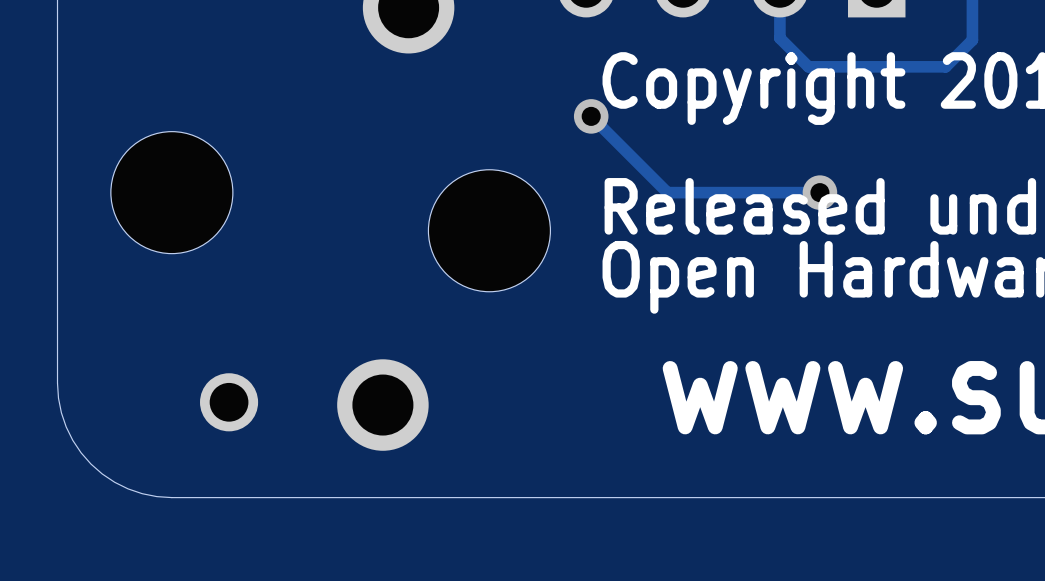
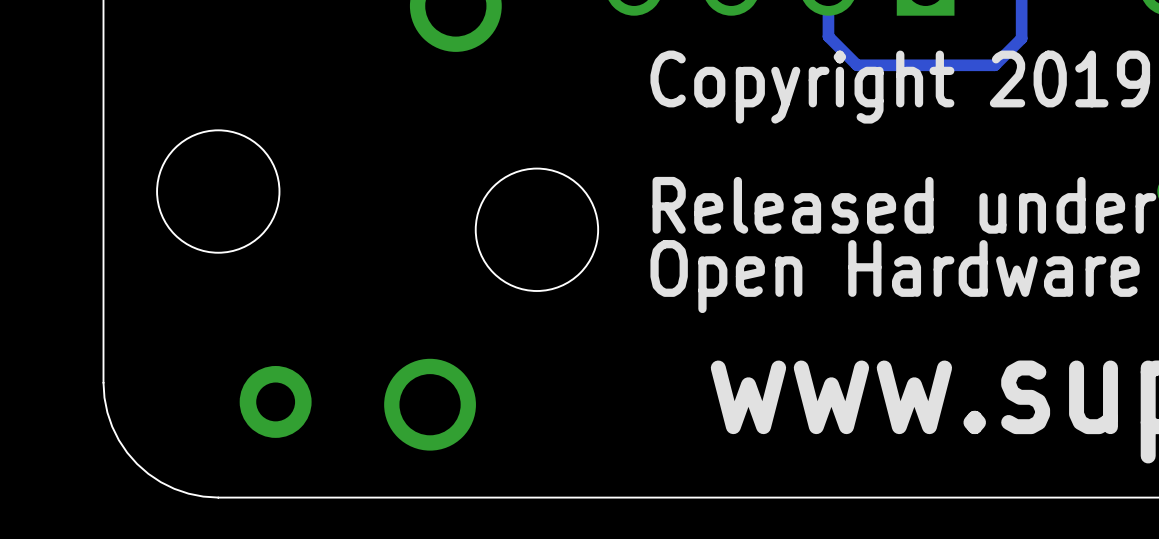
track: (591, 116) (667, 192) (819, 192) -> none
via: (591, 116) -> none
via: (819, 192) -> none
part footprint: [200, 373, 259, 432] -> [239, 365, 312, 438]

